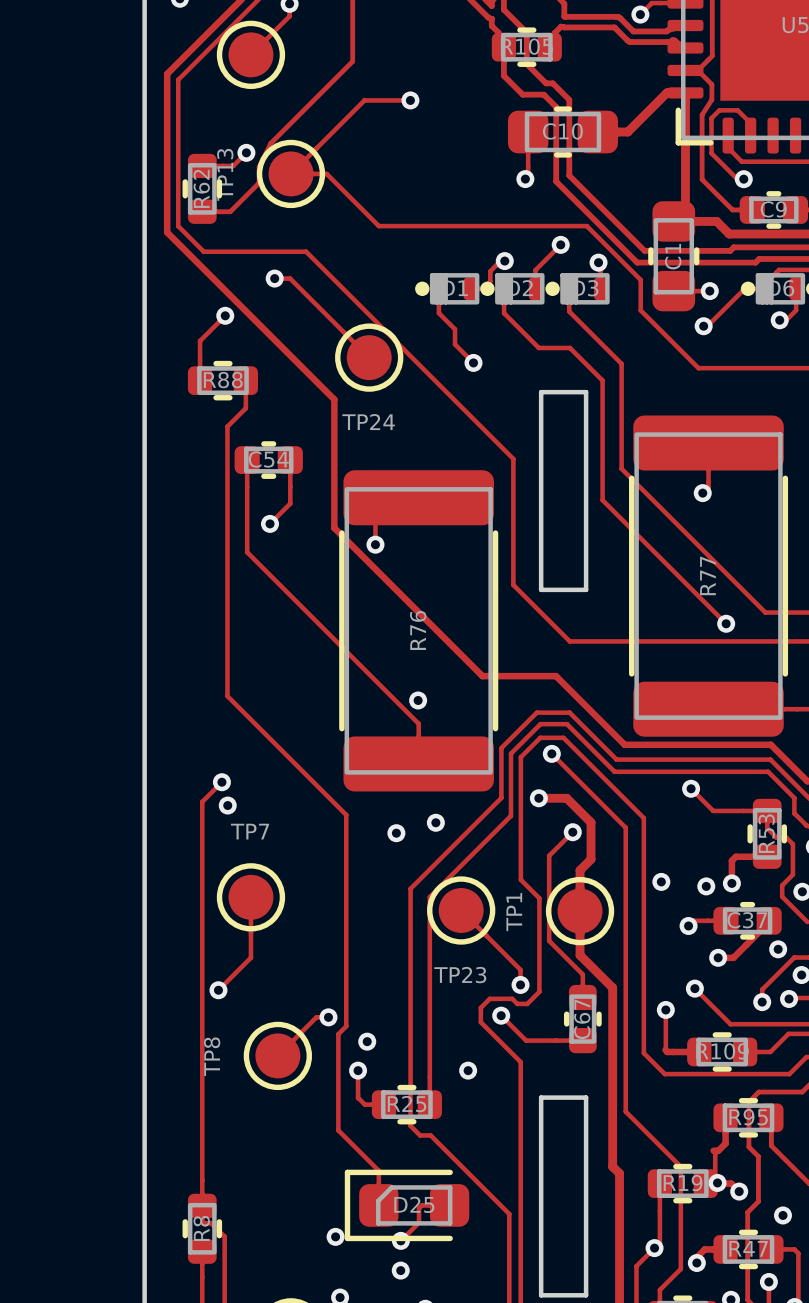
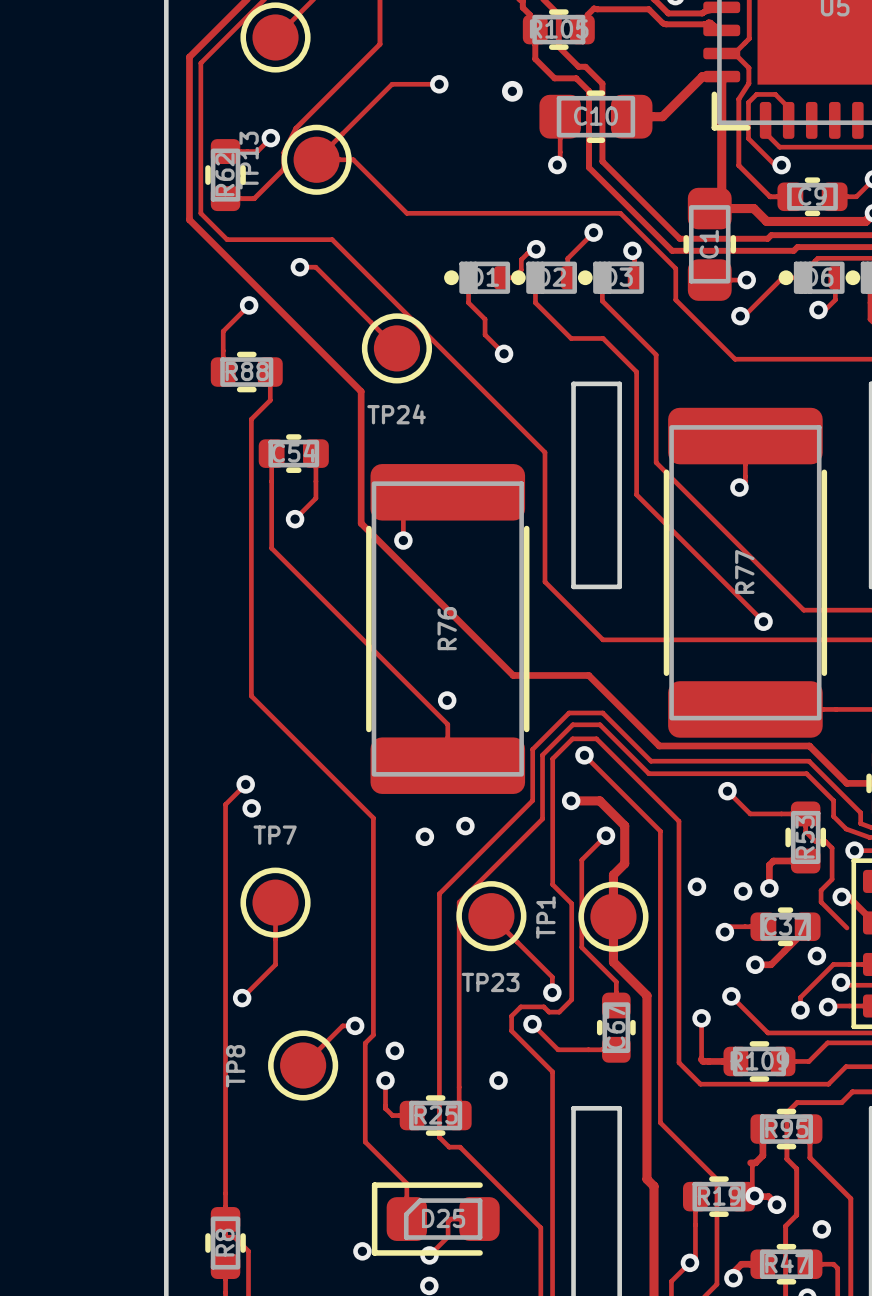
via: none -> (512, 91)

